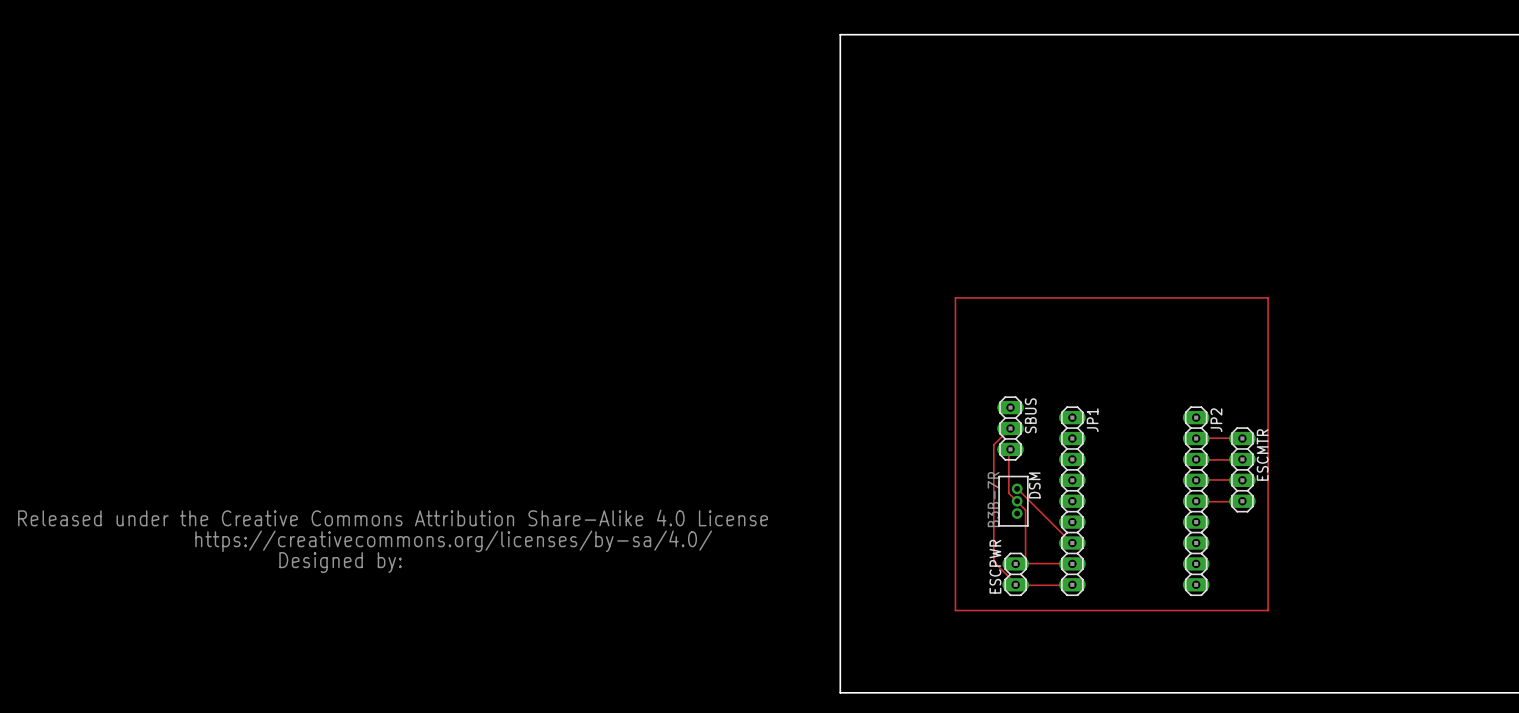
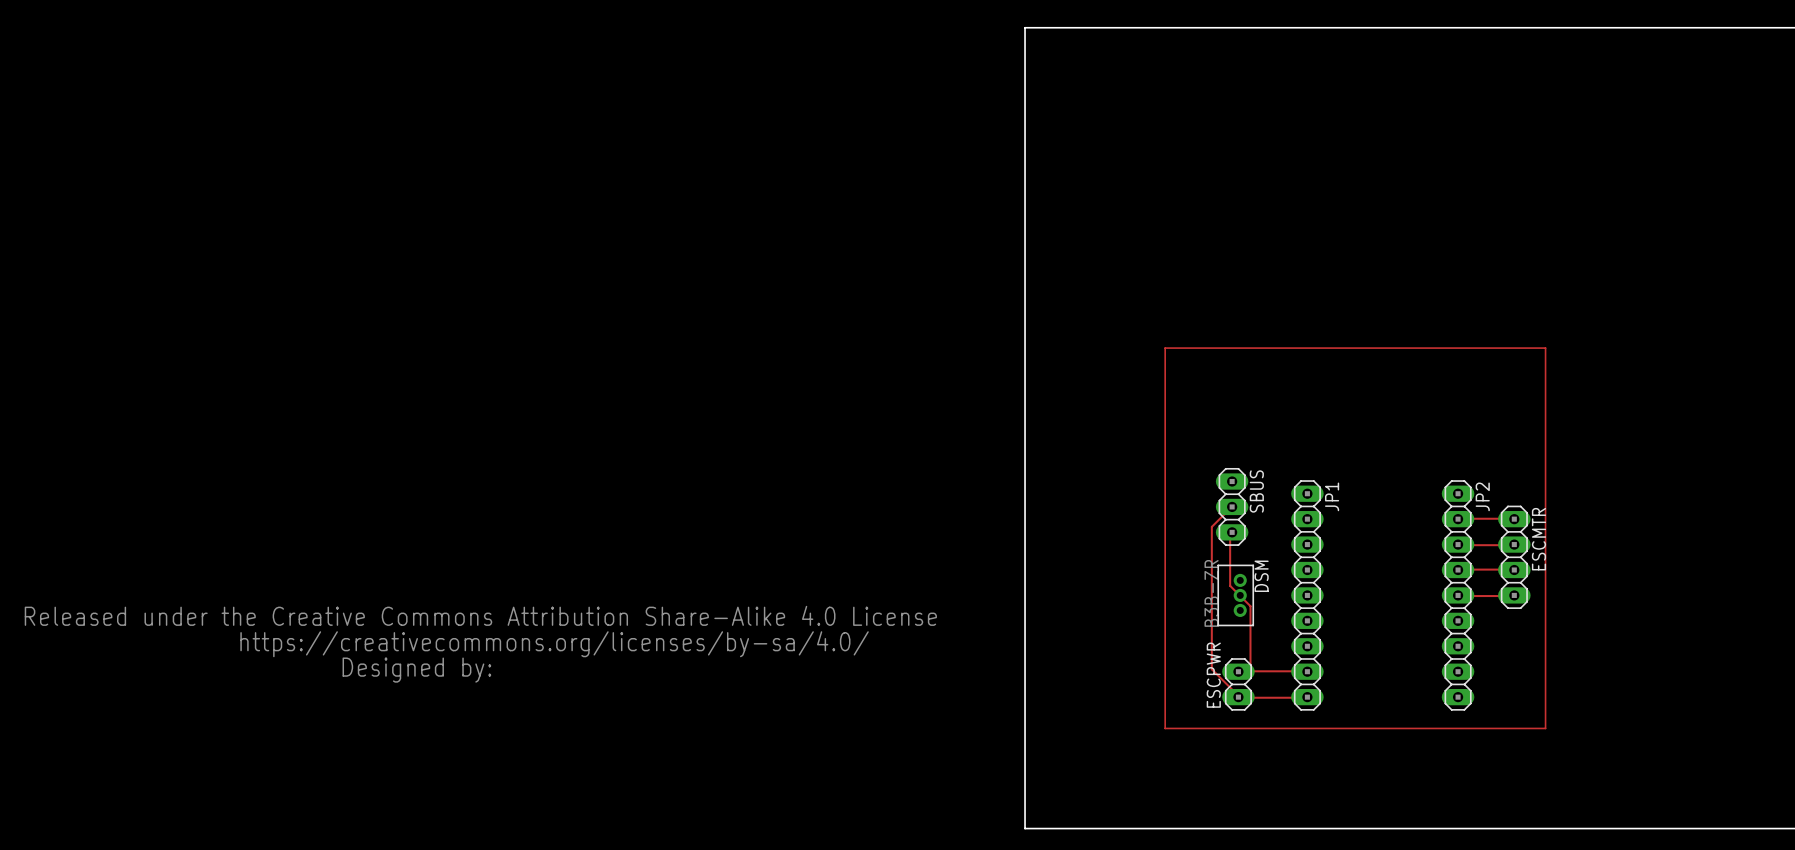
track: (1017, 488) (1072, 543) -> none

